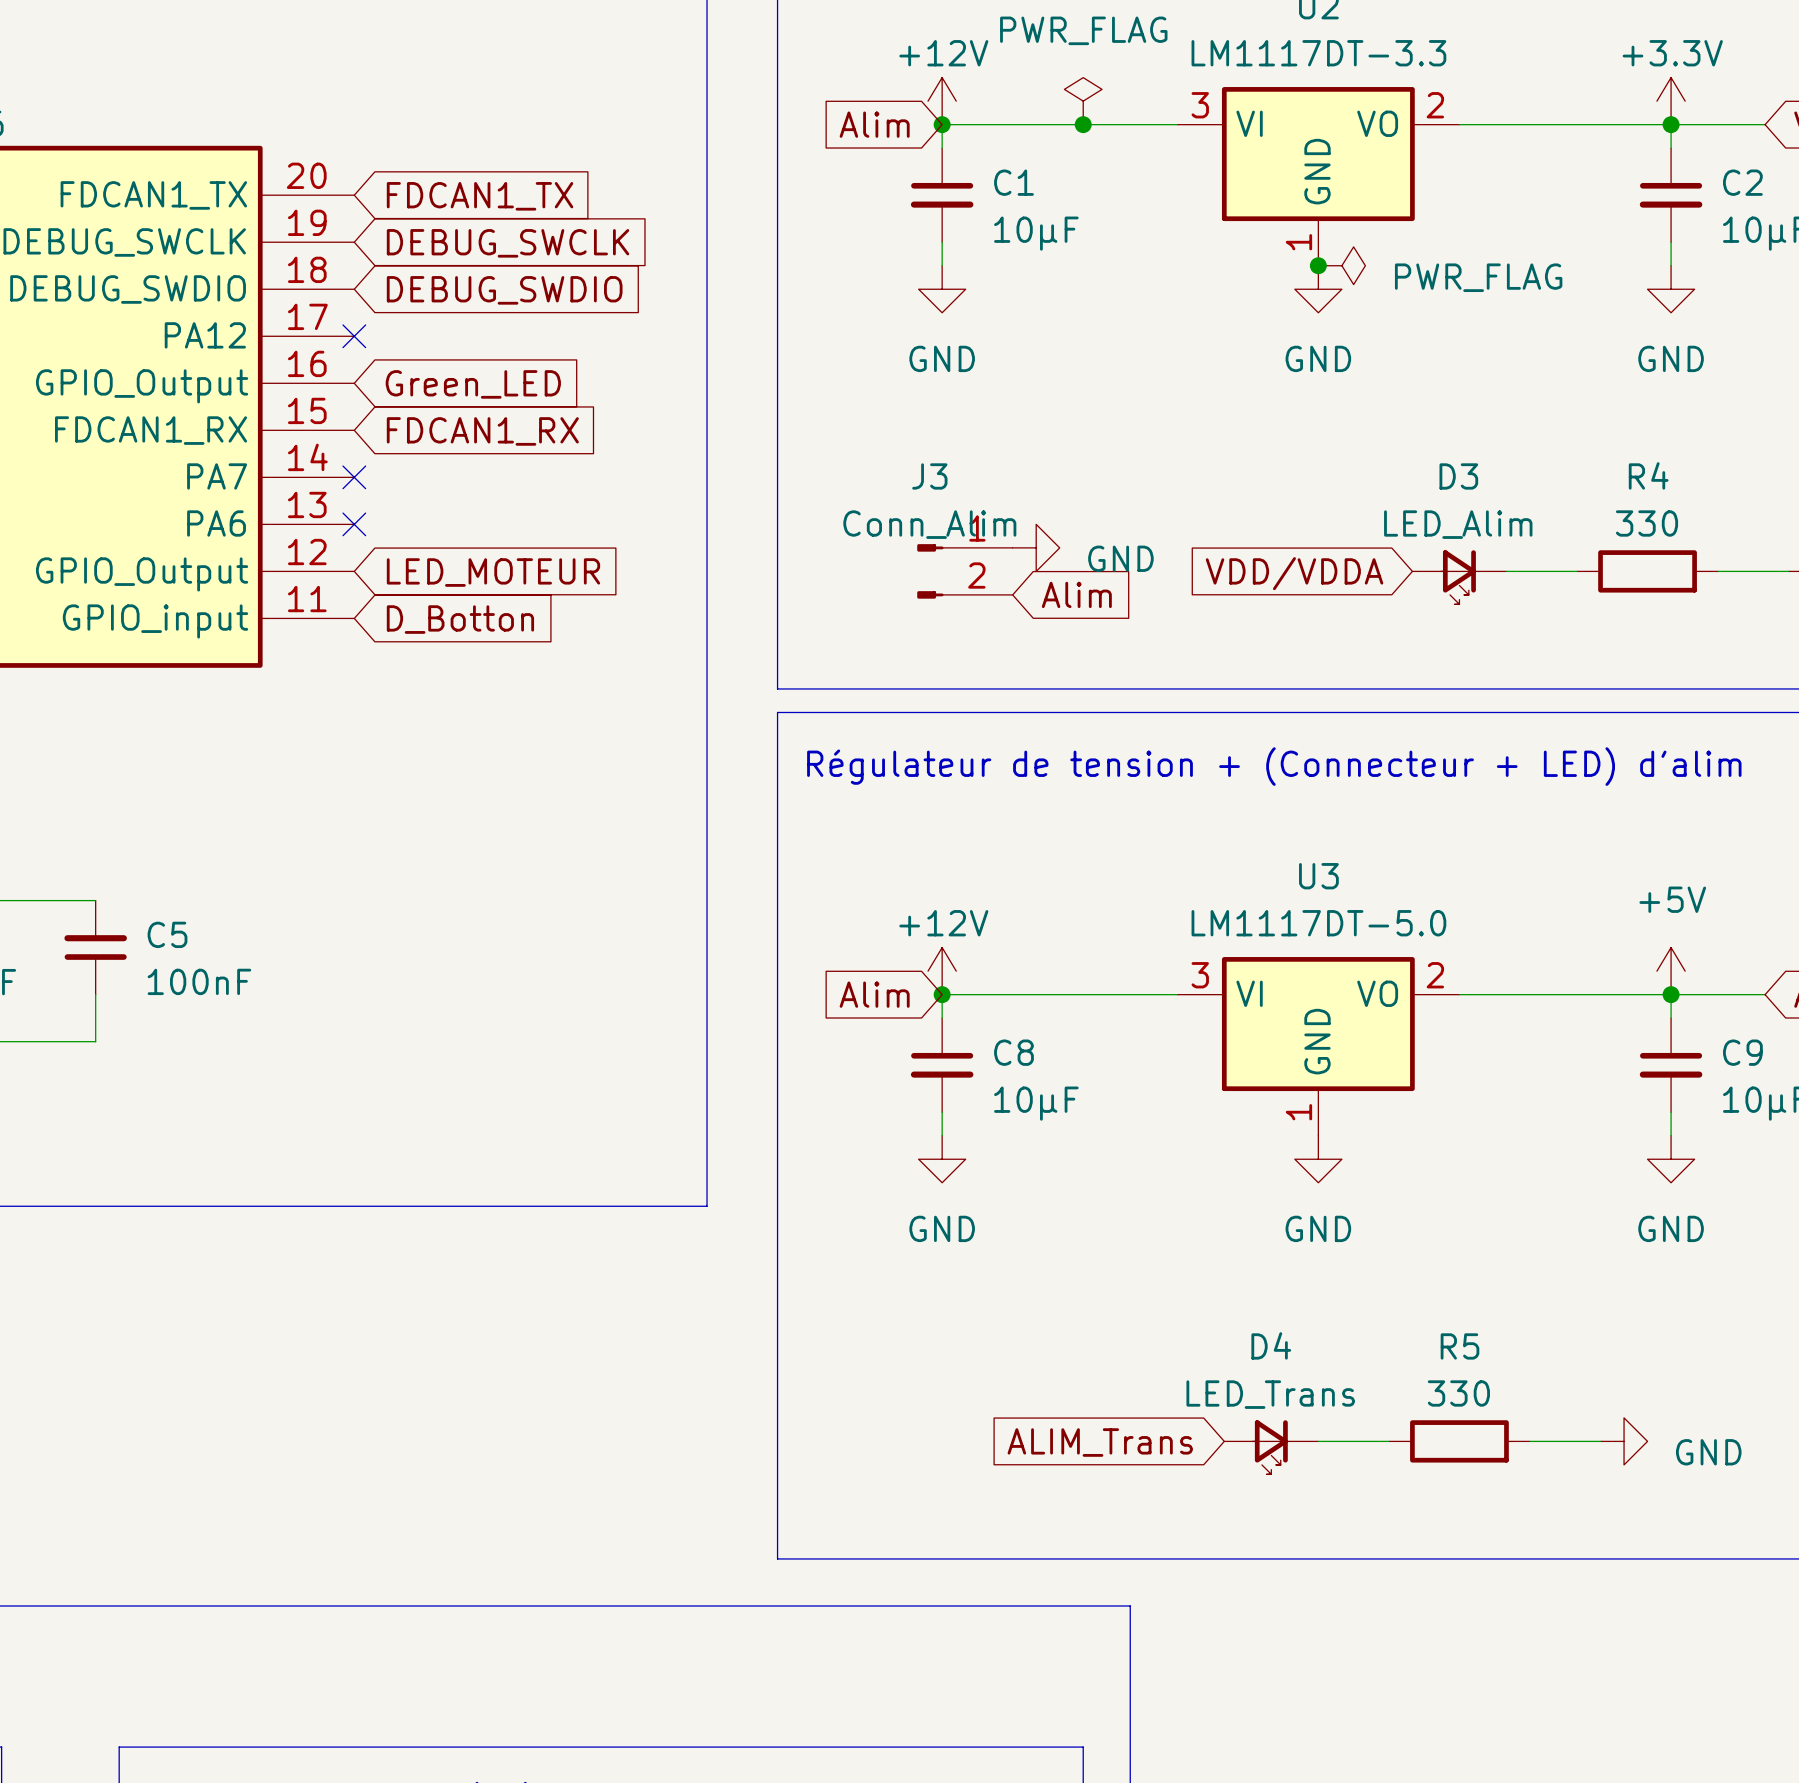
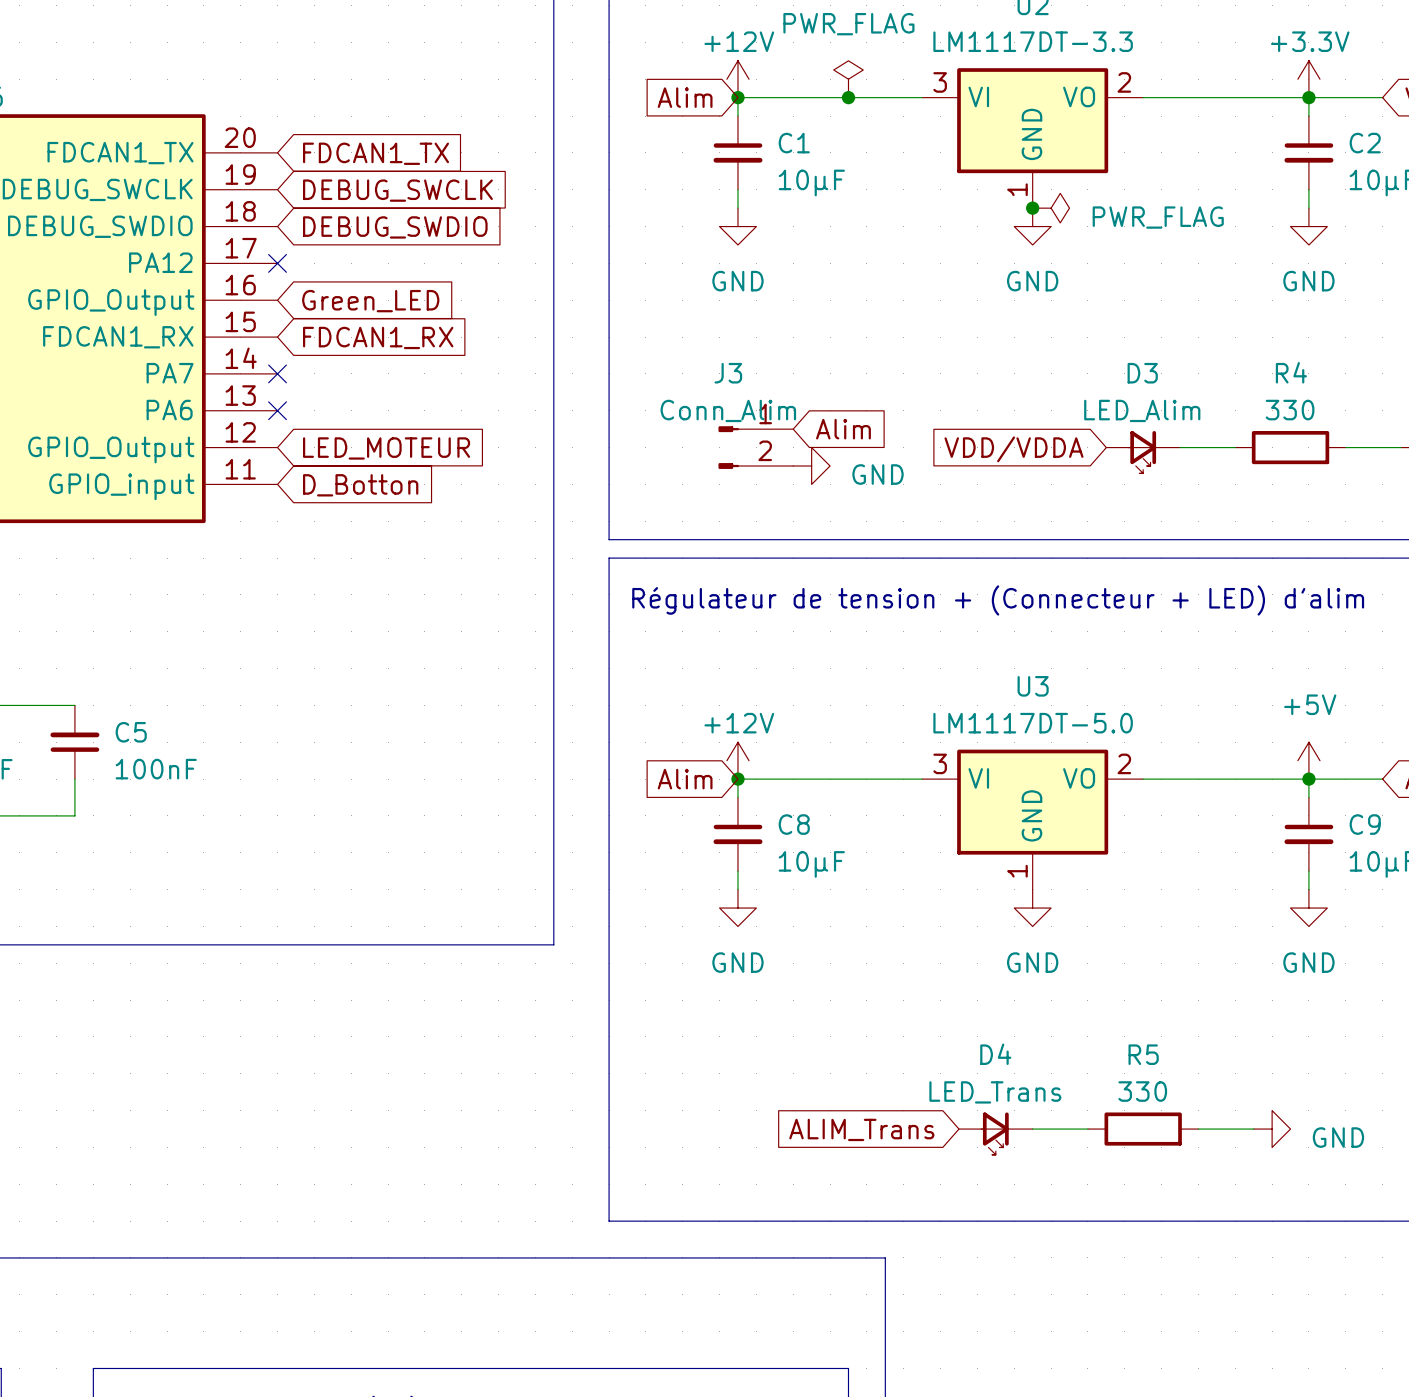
power symbol position: GND (1036, 547) -> GND (811, 466)
global label position: Alim (1076, 594) -> Alim (843, 429)

